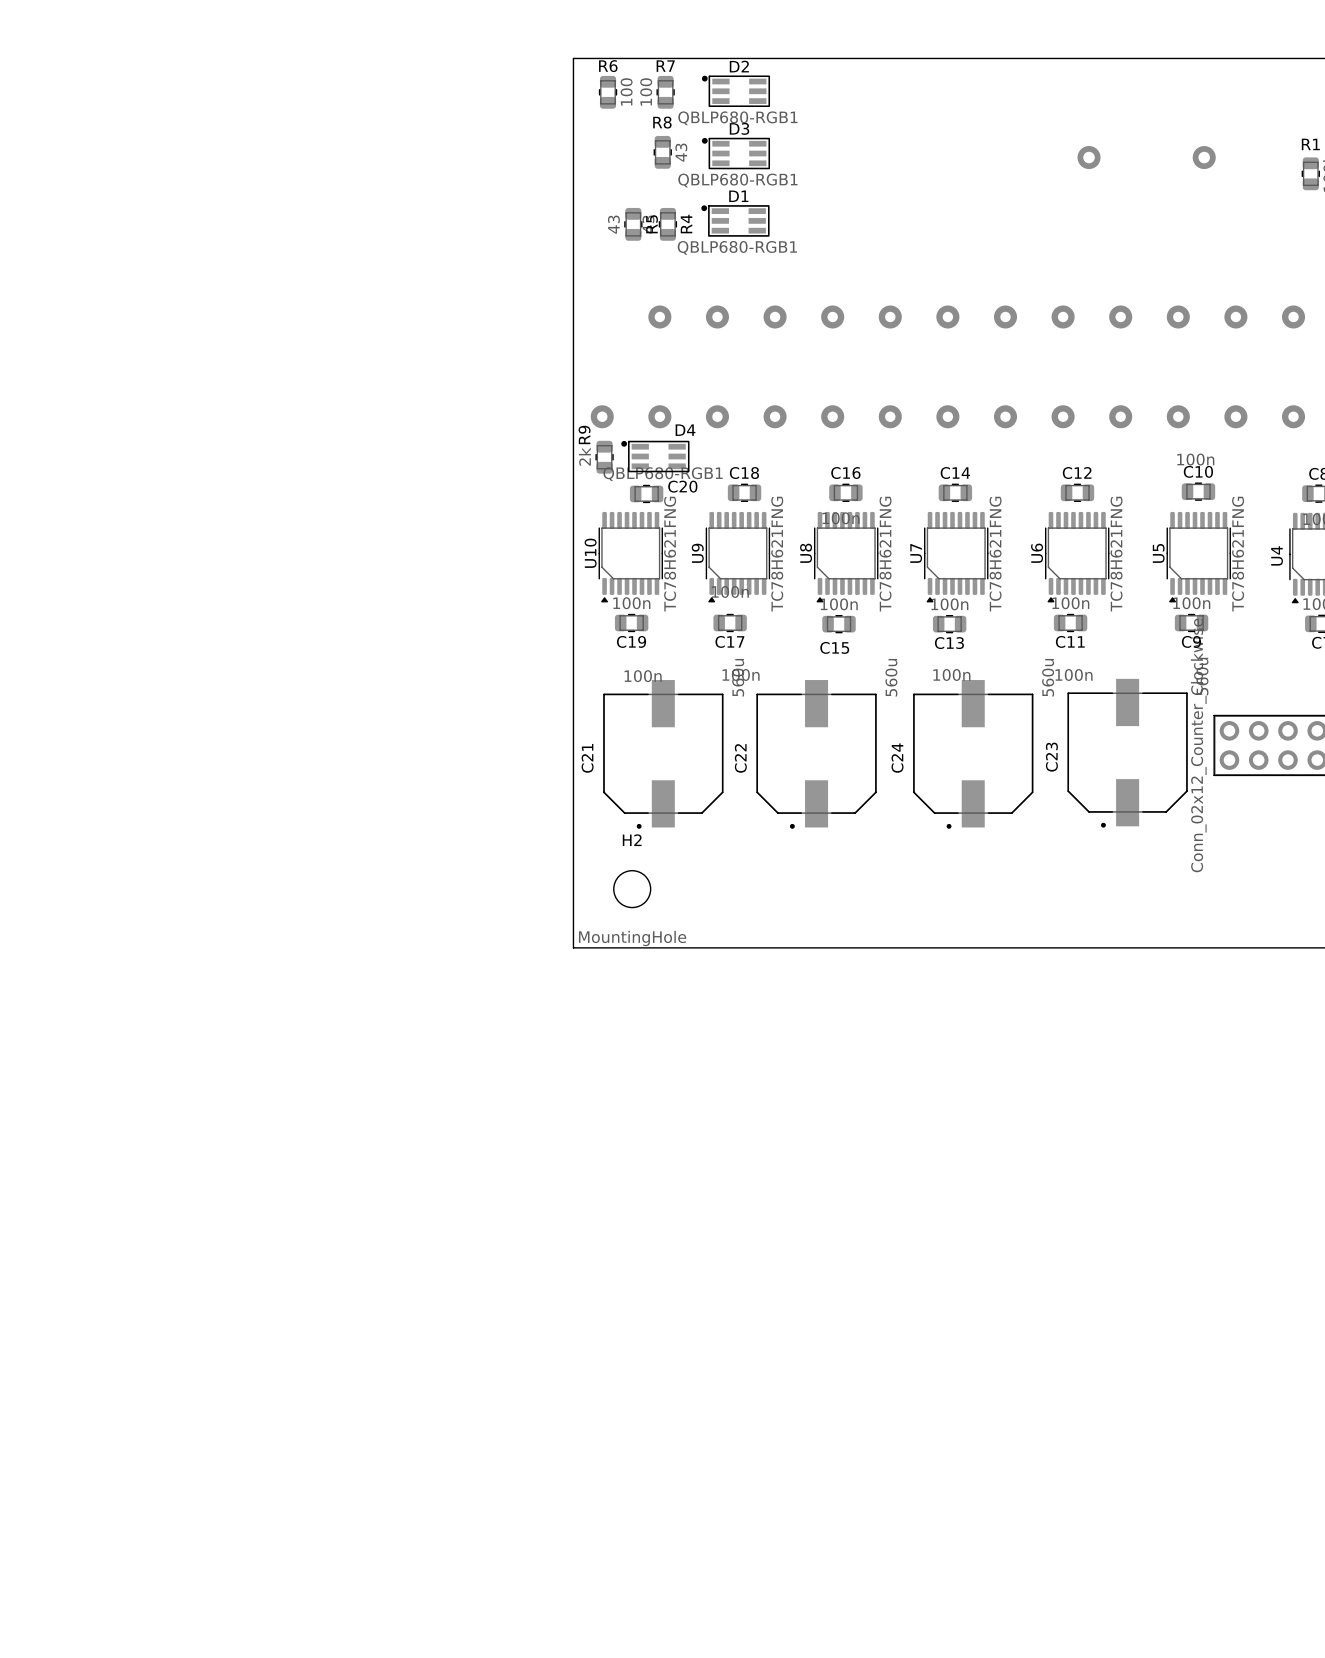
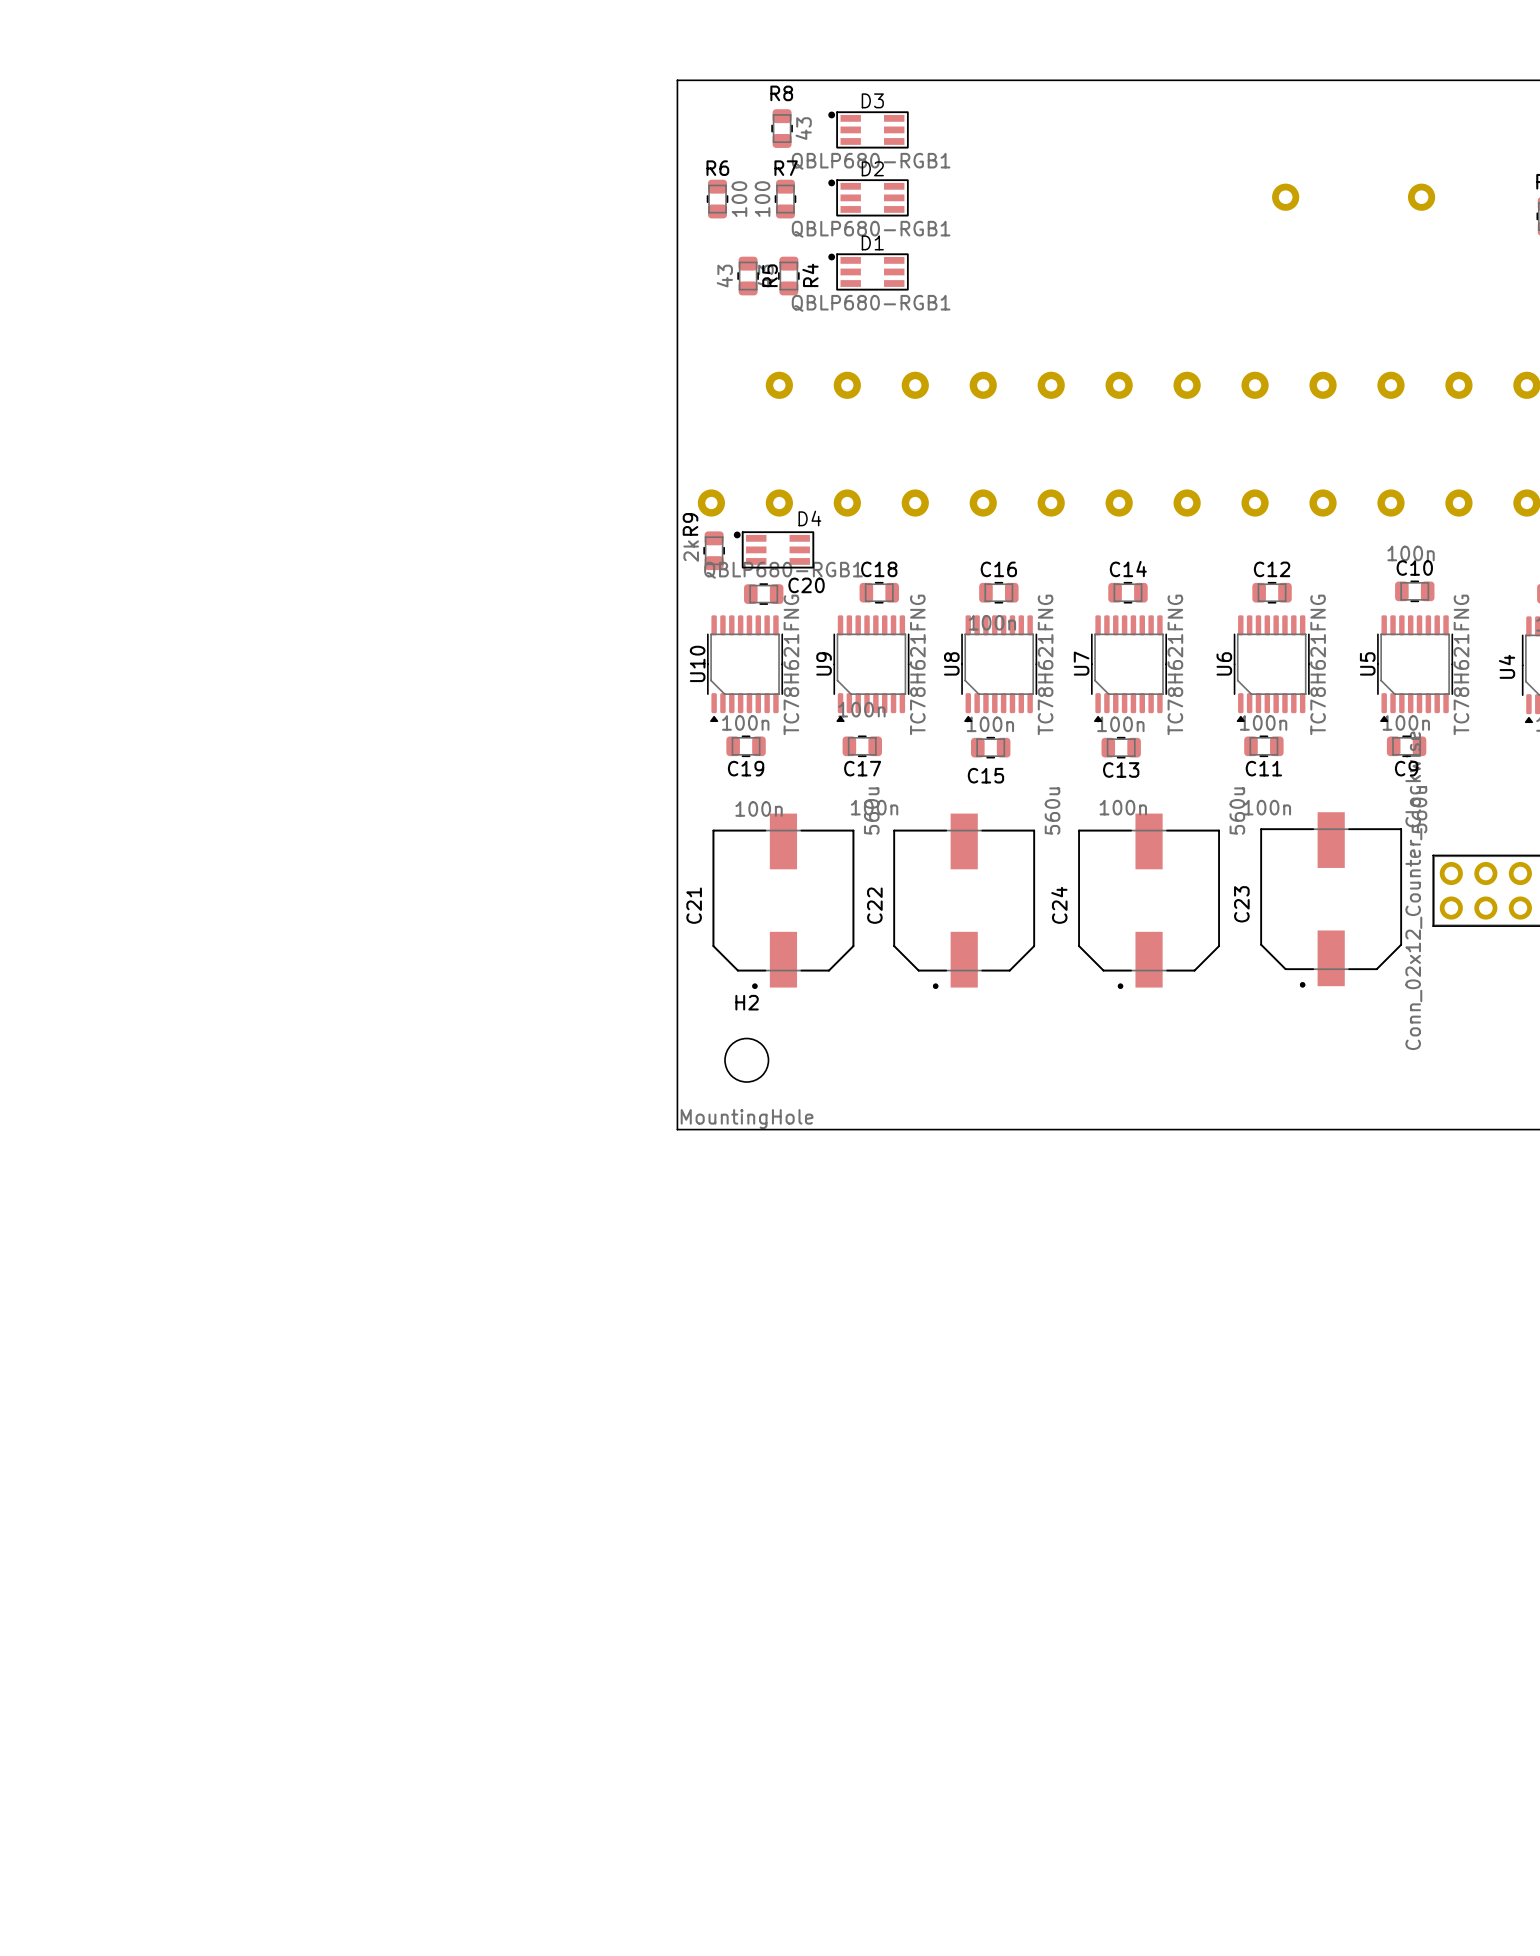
D2 position: (735, 91) -> (868, 197)
R6 position: (608, 92) -> (717, 199)
R7 position: (665, 92) -> (785, 199)
R8 position: (662, 152) -> (782, 128)
D3 position: (735, 153) -> (868, 129)

